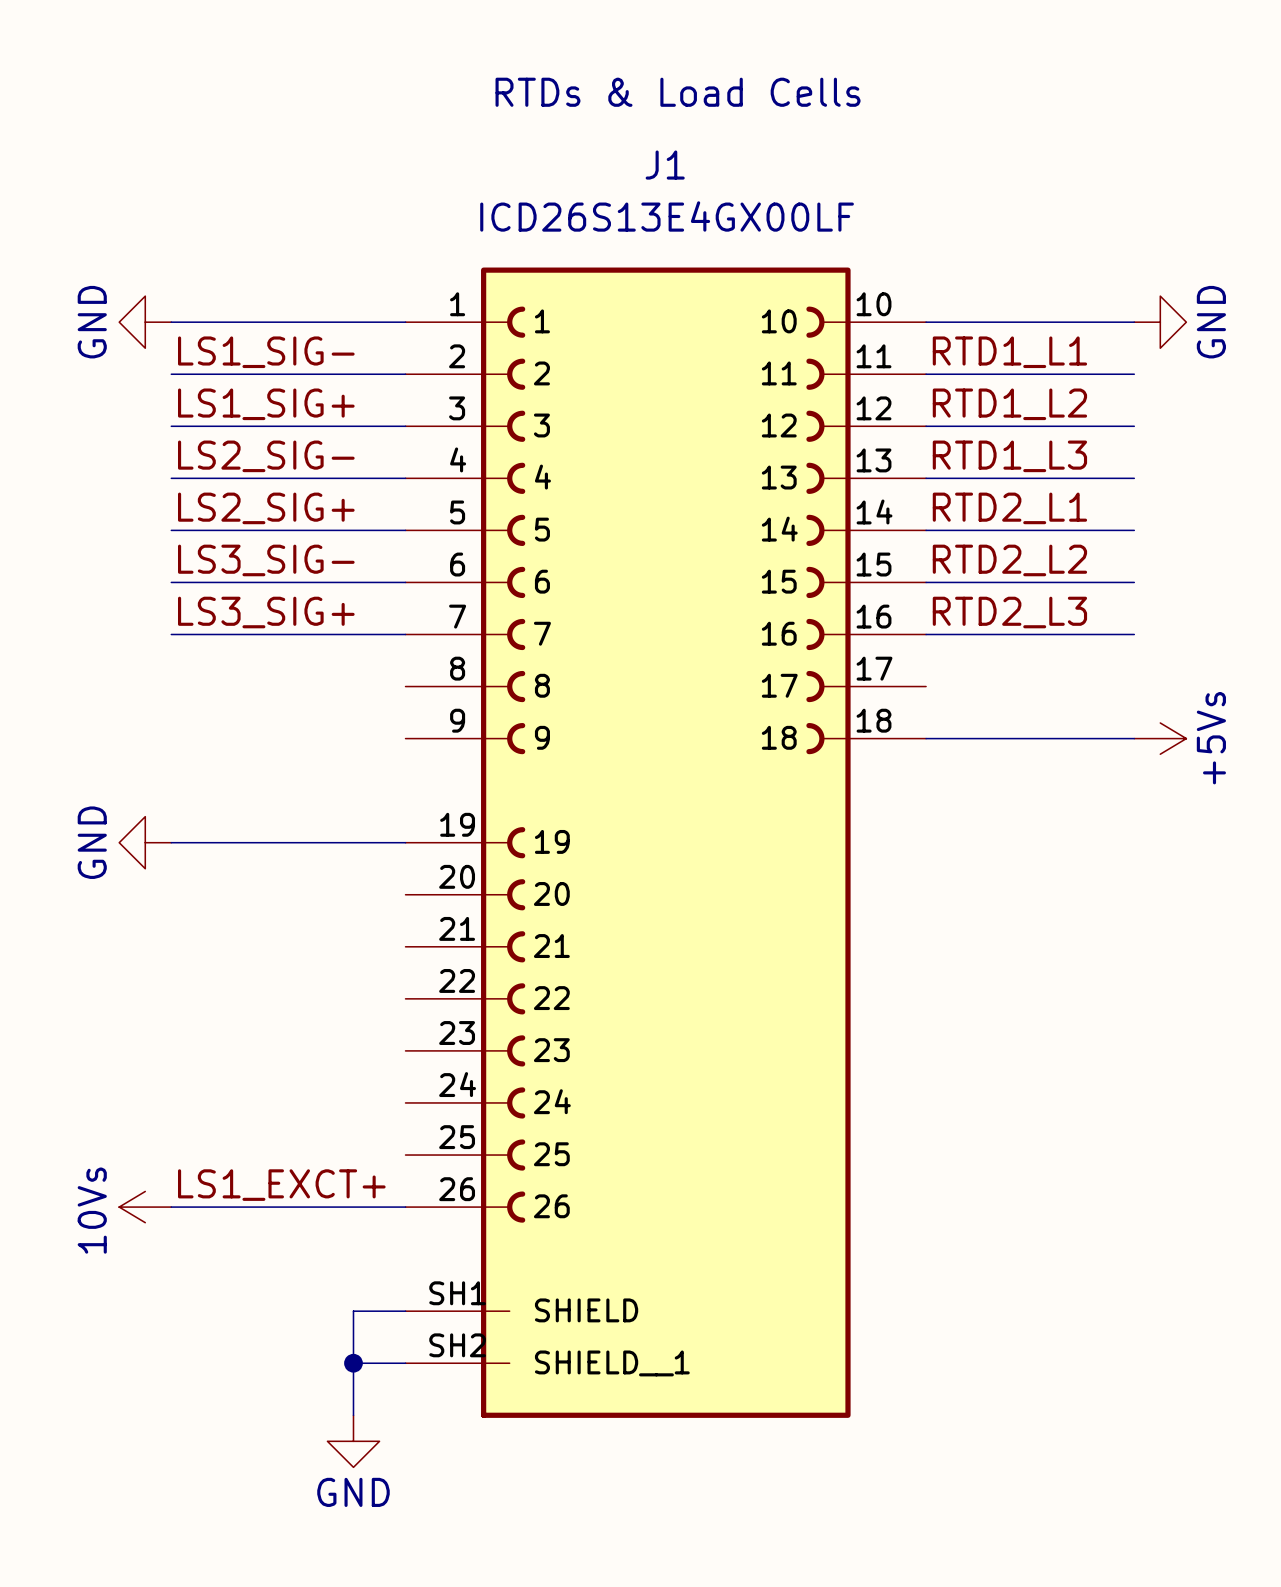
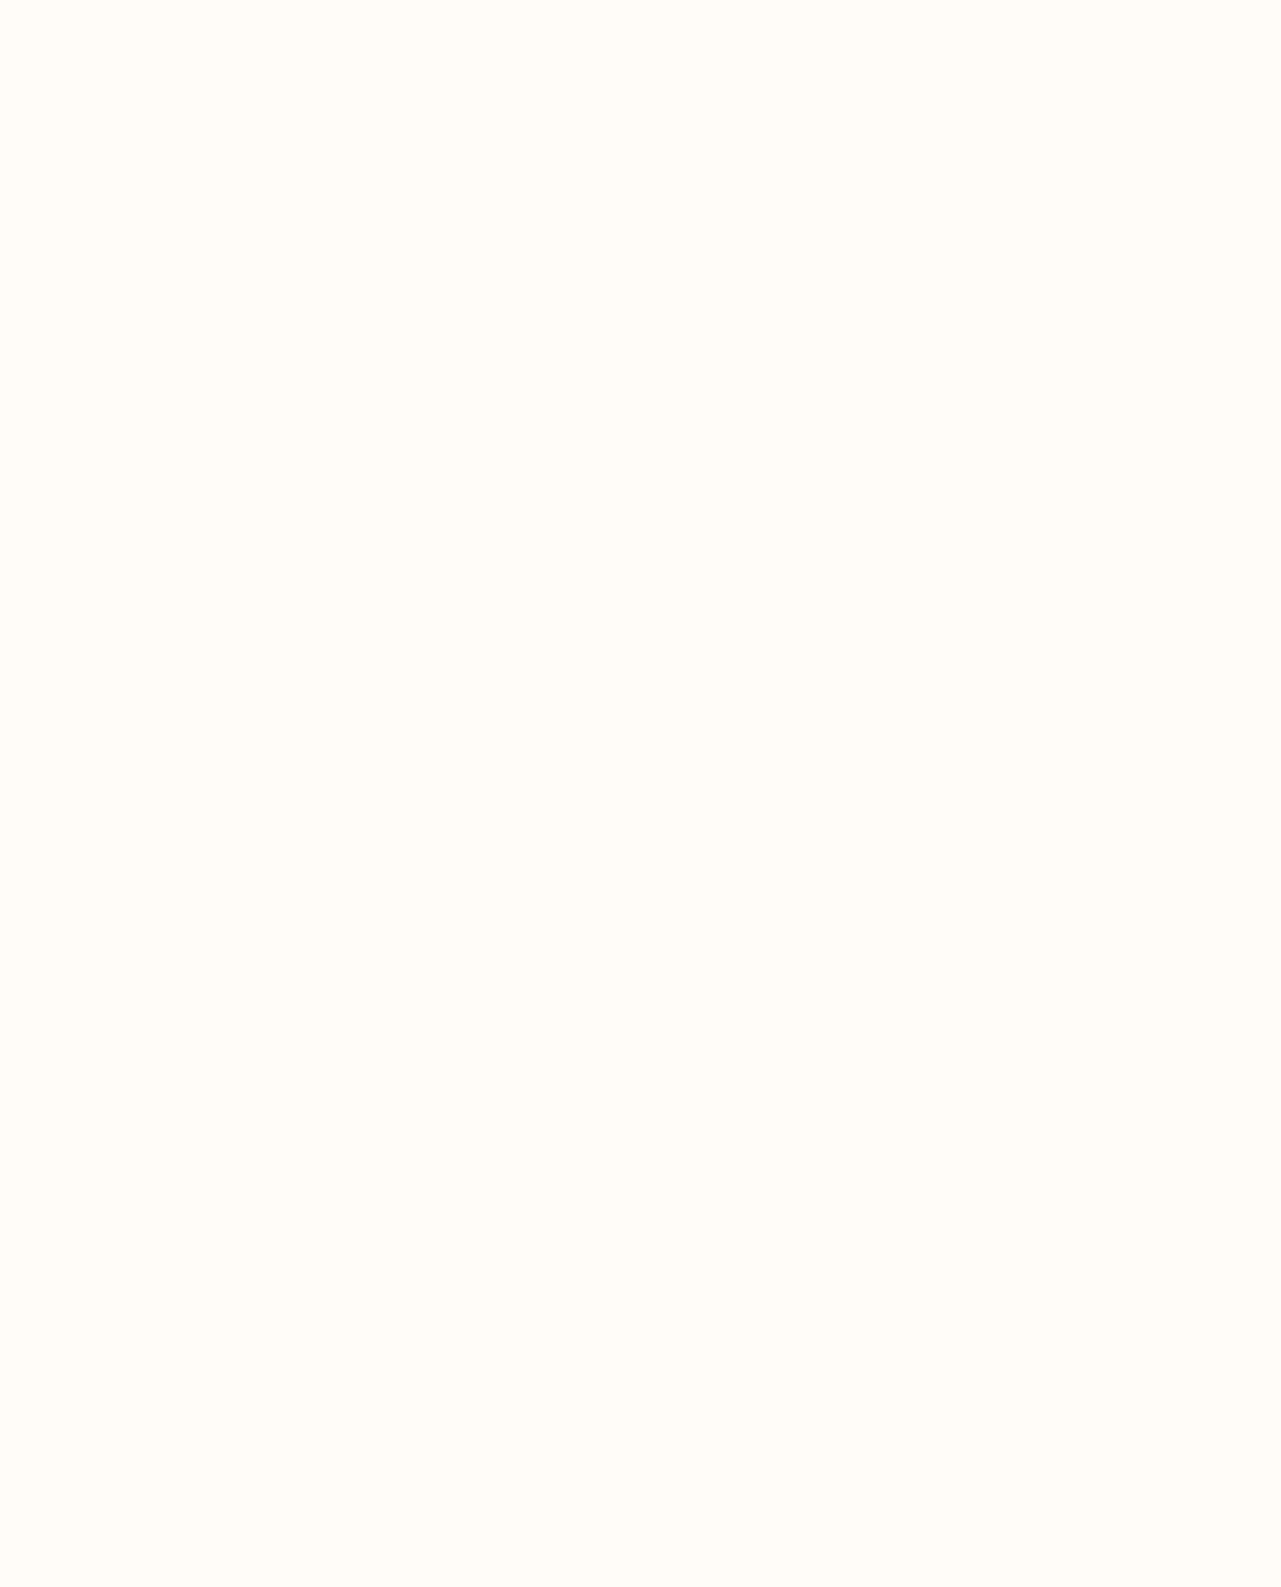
text: RTDs & Load Cells (678, 92) -> none
power symbol: GND (145, 322) -> none
wire: (171, 322) (405, 322) -> none
wire: (926, 322) (1134, 322) -> none
power symbol: GND (1160, 322) -> none
label: LS1_SIG- (266, 352) -> none
label: RTD1_L1 (1009, 352) -> none
wire: (171, 374) (405, 374) -> none
wire: (926, 374) (1134, 374) -> none
label: LS1_SIG+ (266, 404) -> none
label: RTD1_L2 (1009, 404) -> none
wire: (171, 426) (405, 426) -> none
wire: (926, 426) (1134, 426) -> none
label: LS2_SIG- (266, 456) -> none
label: RTD1_L3 (1009, 456) -> none
wire: (171, 478) (405, 478) -> none
wire: (926, 478) (1134, 478) -> none
label: LS2_SIG+ (266, 508) -> none
label: RTD2_L1 (1009, 508) -> none
wire: (171, 530) (405, 530) -> none
wire: (926, 530) (1134, 530) -> none
label: LS3_SIG- (266, 560) -> none
label: RTD2_L2 (1009, 560) -> none
wire: (171, 582) (405, 582) -> none
wire: (926, 582) (1134, 582) -> none
label: LS3_SIG+ (266, 612) -> none
label: RTD2_L3 (1009, 612) -> none
wire: (171, 634) (405, 634) -> none
wire: (926, 634) (1134, 634) -> none
wire: (926, 738) (1134, 738) -> none
power symbol: +5Vs (1160, 738) -> none
power symbol: GND (145, 842) -> none
wire: (171, 842) (405, 842) -> none
J1: ICD26S13E4GX00LF (665, 842) -> none
label: LS1_EXCT+ (281, 1185) -> none
power symbol: 10Vs (145, 1207) -> none
wire: (171, 1207) (405, 1207) -> none
wire: (405, 1311) (353, 1311) (353, 1415) -> none
wire: (353, 1363) (405, 1363) -> none
junction: (353, 1363) -> none
power symbol: GND (353, 1441) -> none

